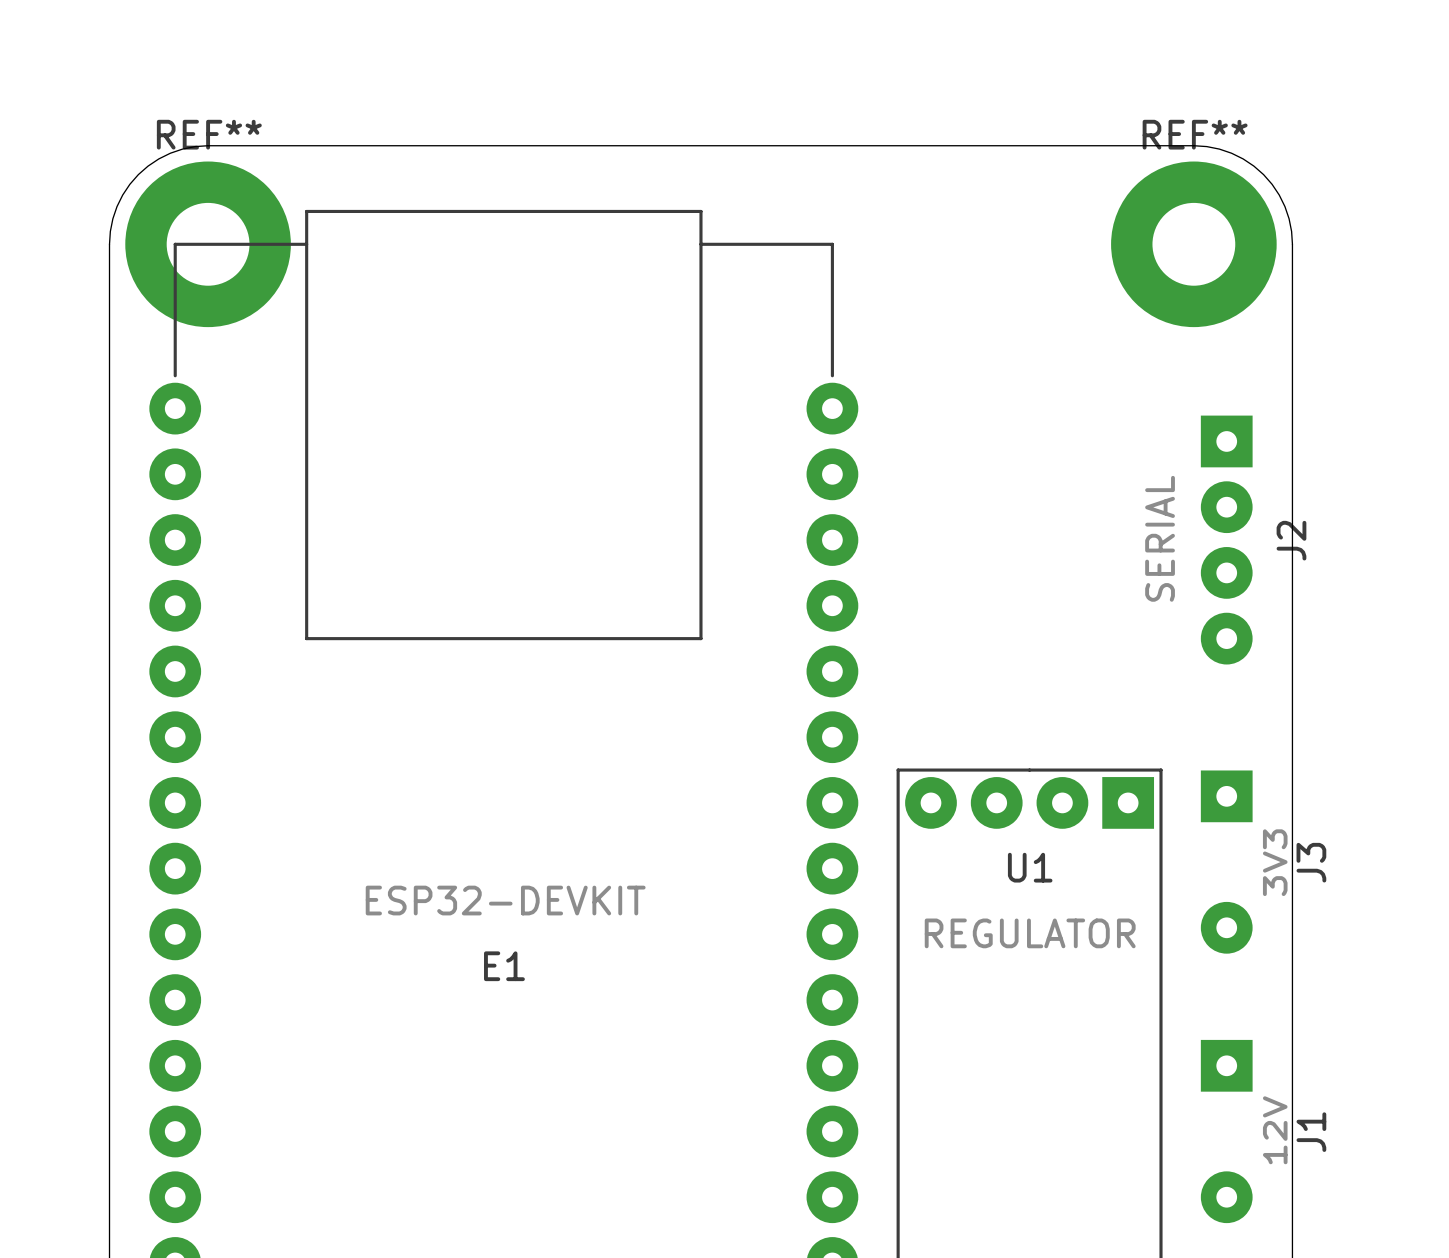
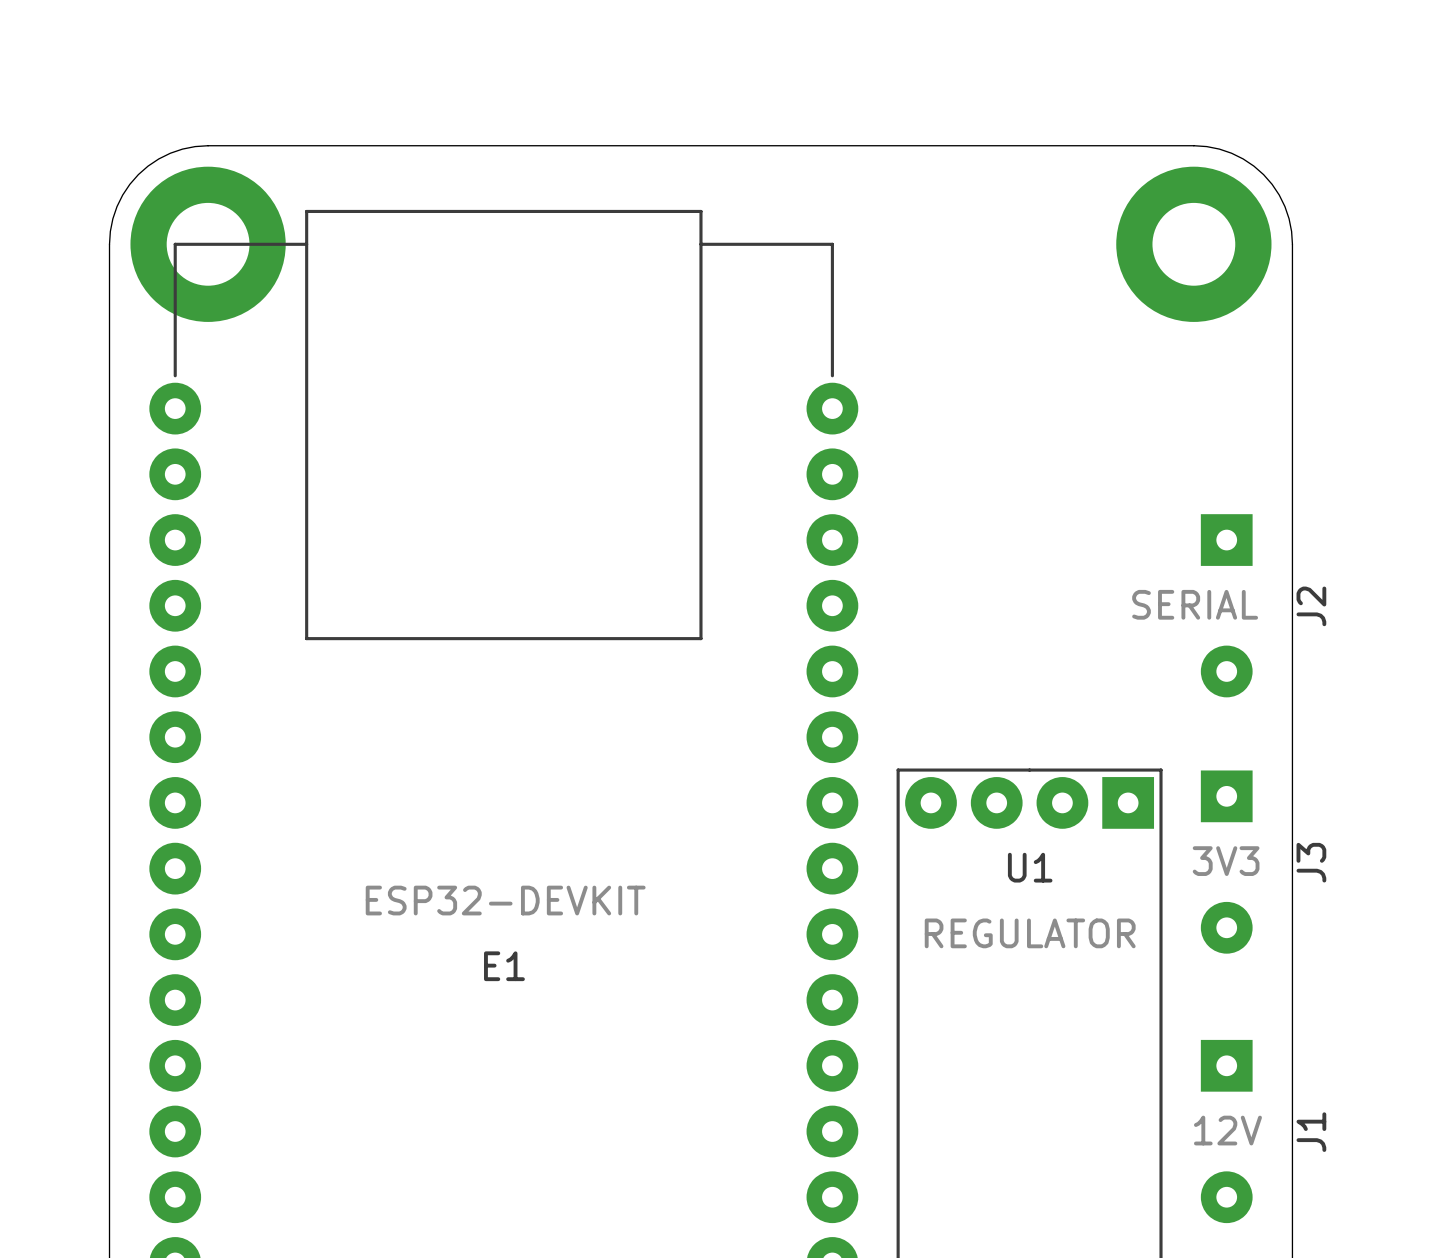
REF**: (208, 244) -> none
via: none -> (208, 244)
REF**: (1193, 244) -> none
via: none -> (1193, 244)
J2 footprint: [1200, 415, 1253, 665] -> [1200, 514, 1253, 698]
J3 value rotation: 0° (1275, 862) -> 90° clockwise (1226, 861)
J1 value rotation: 0° (1275, 1130) -> 90° clockwise (1227, 1130)

